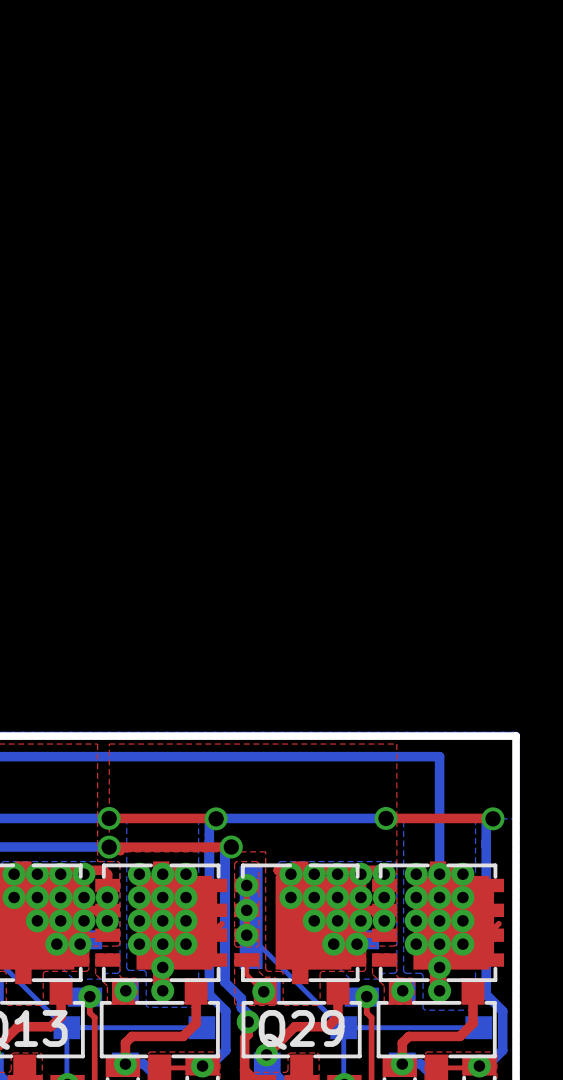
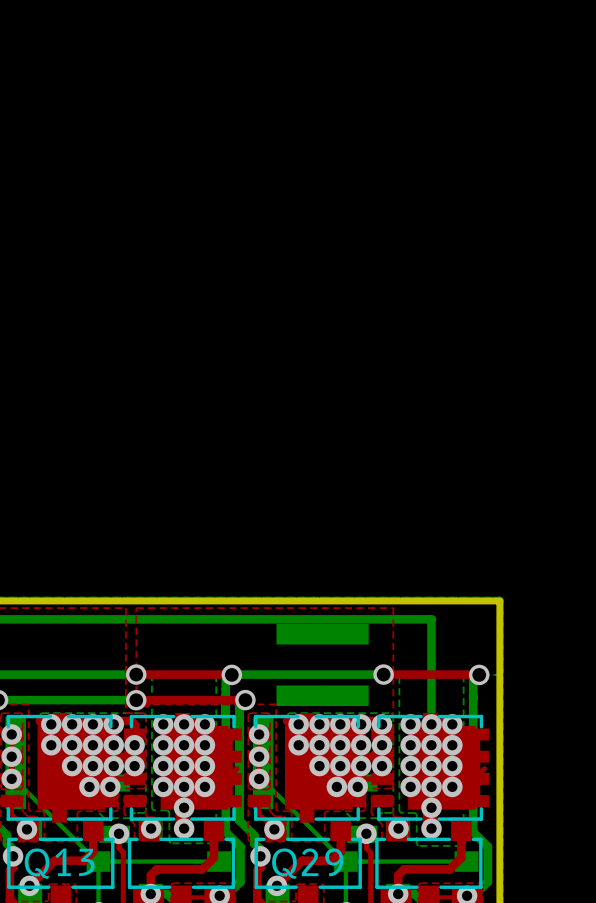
part: none -> (299, 664)
part: none -> (345, 664)

